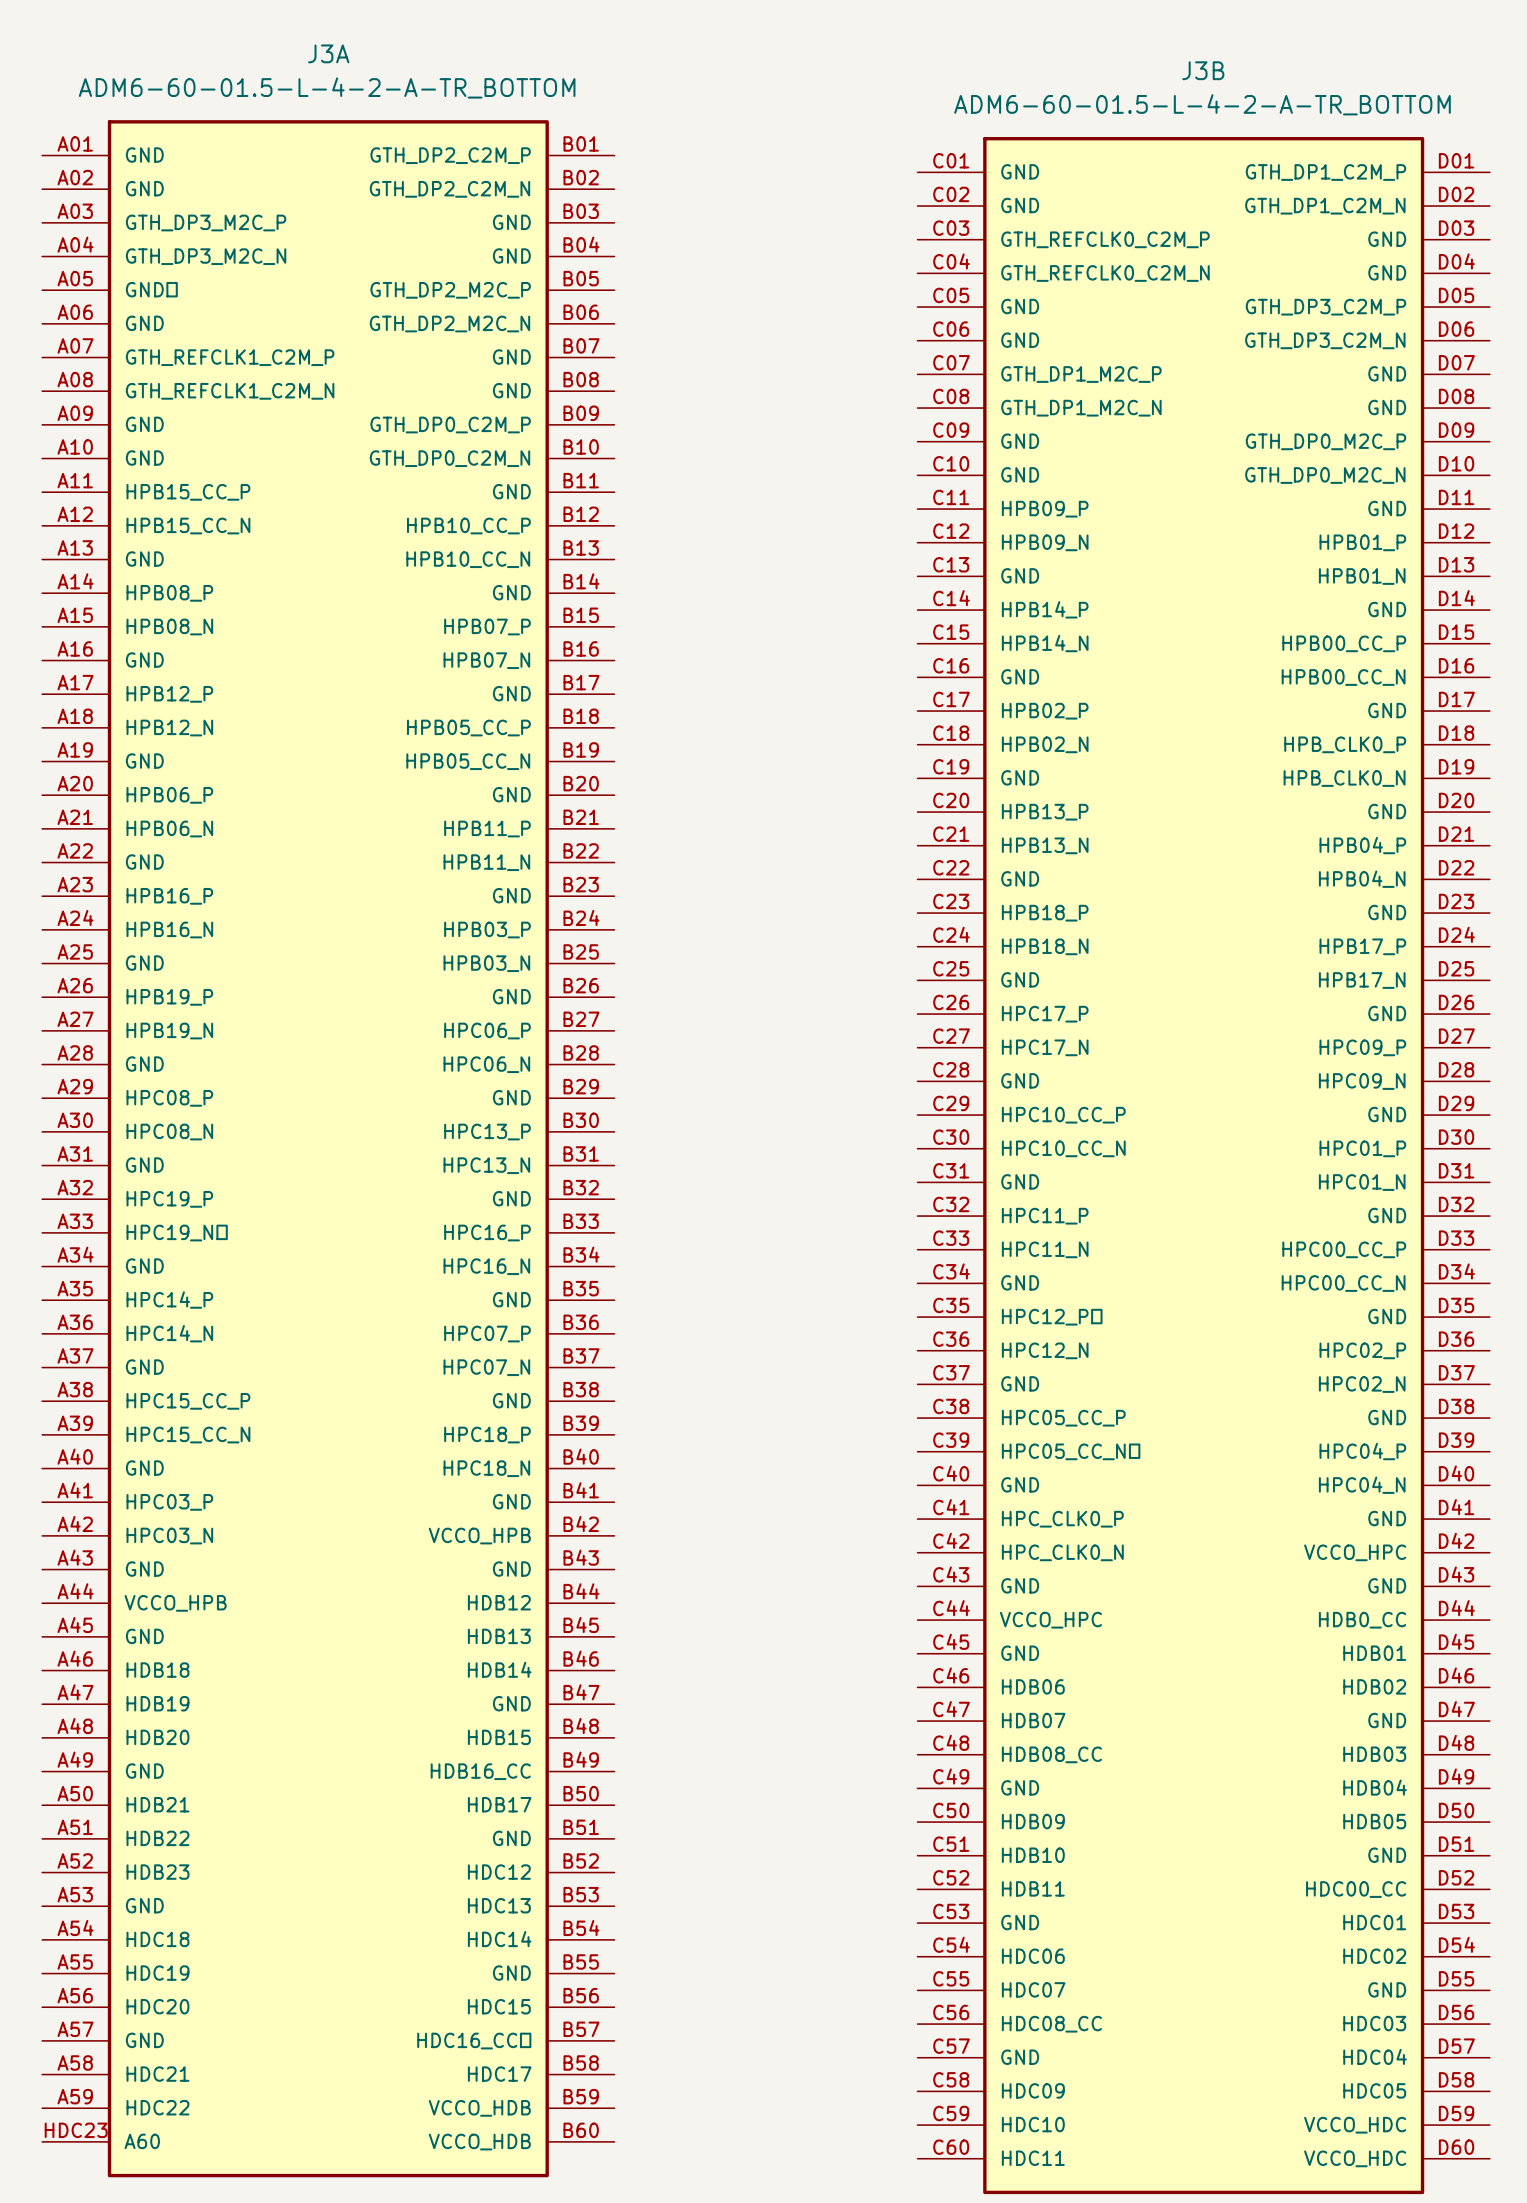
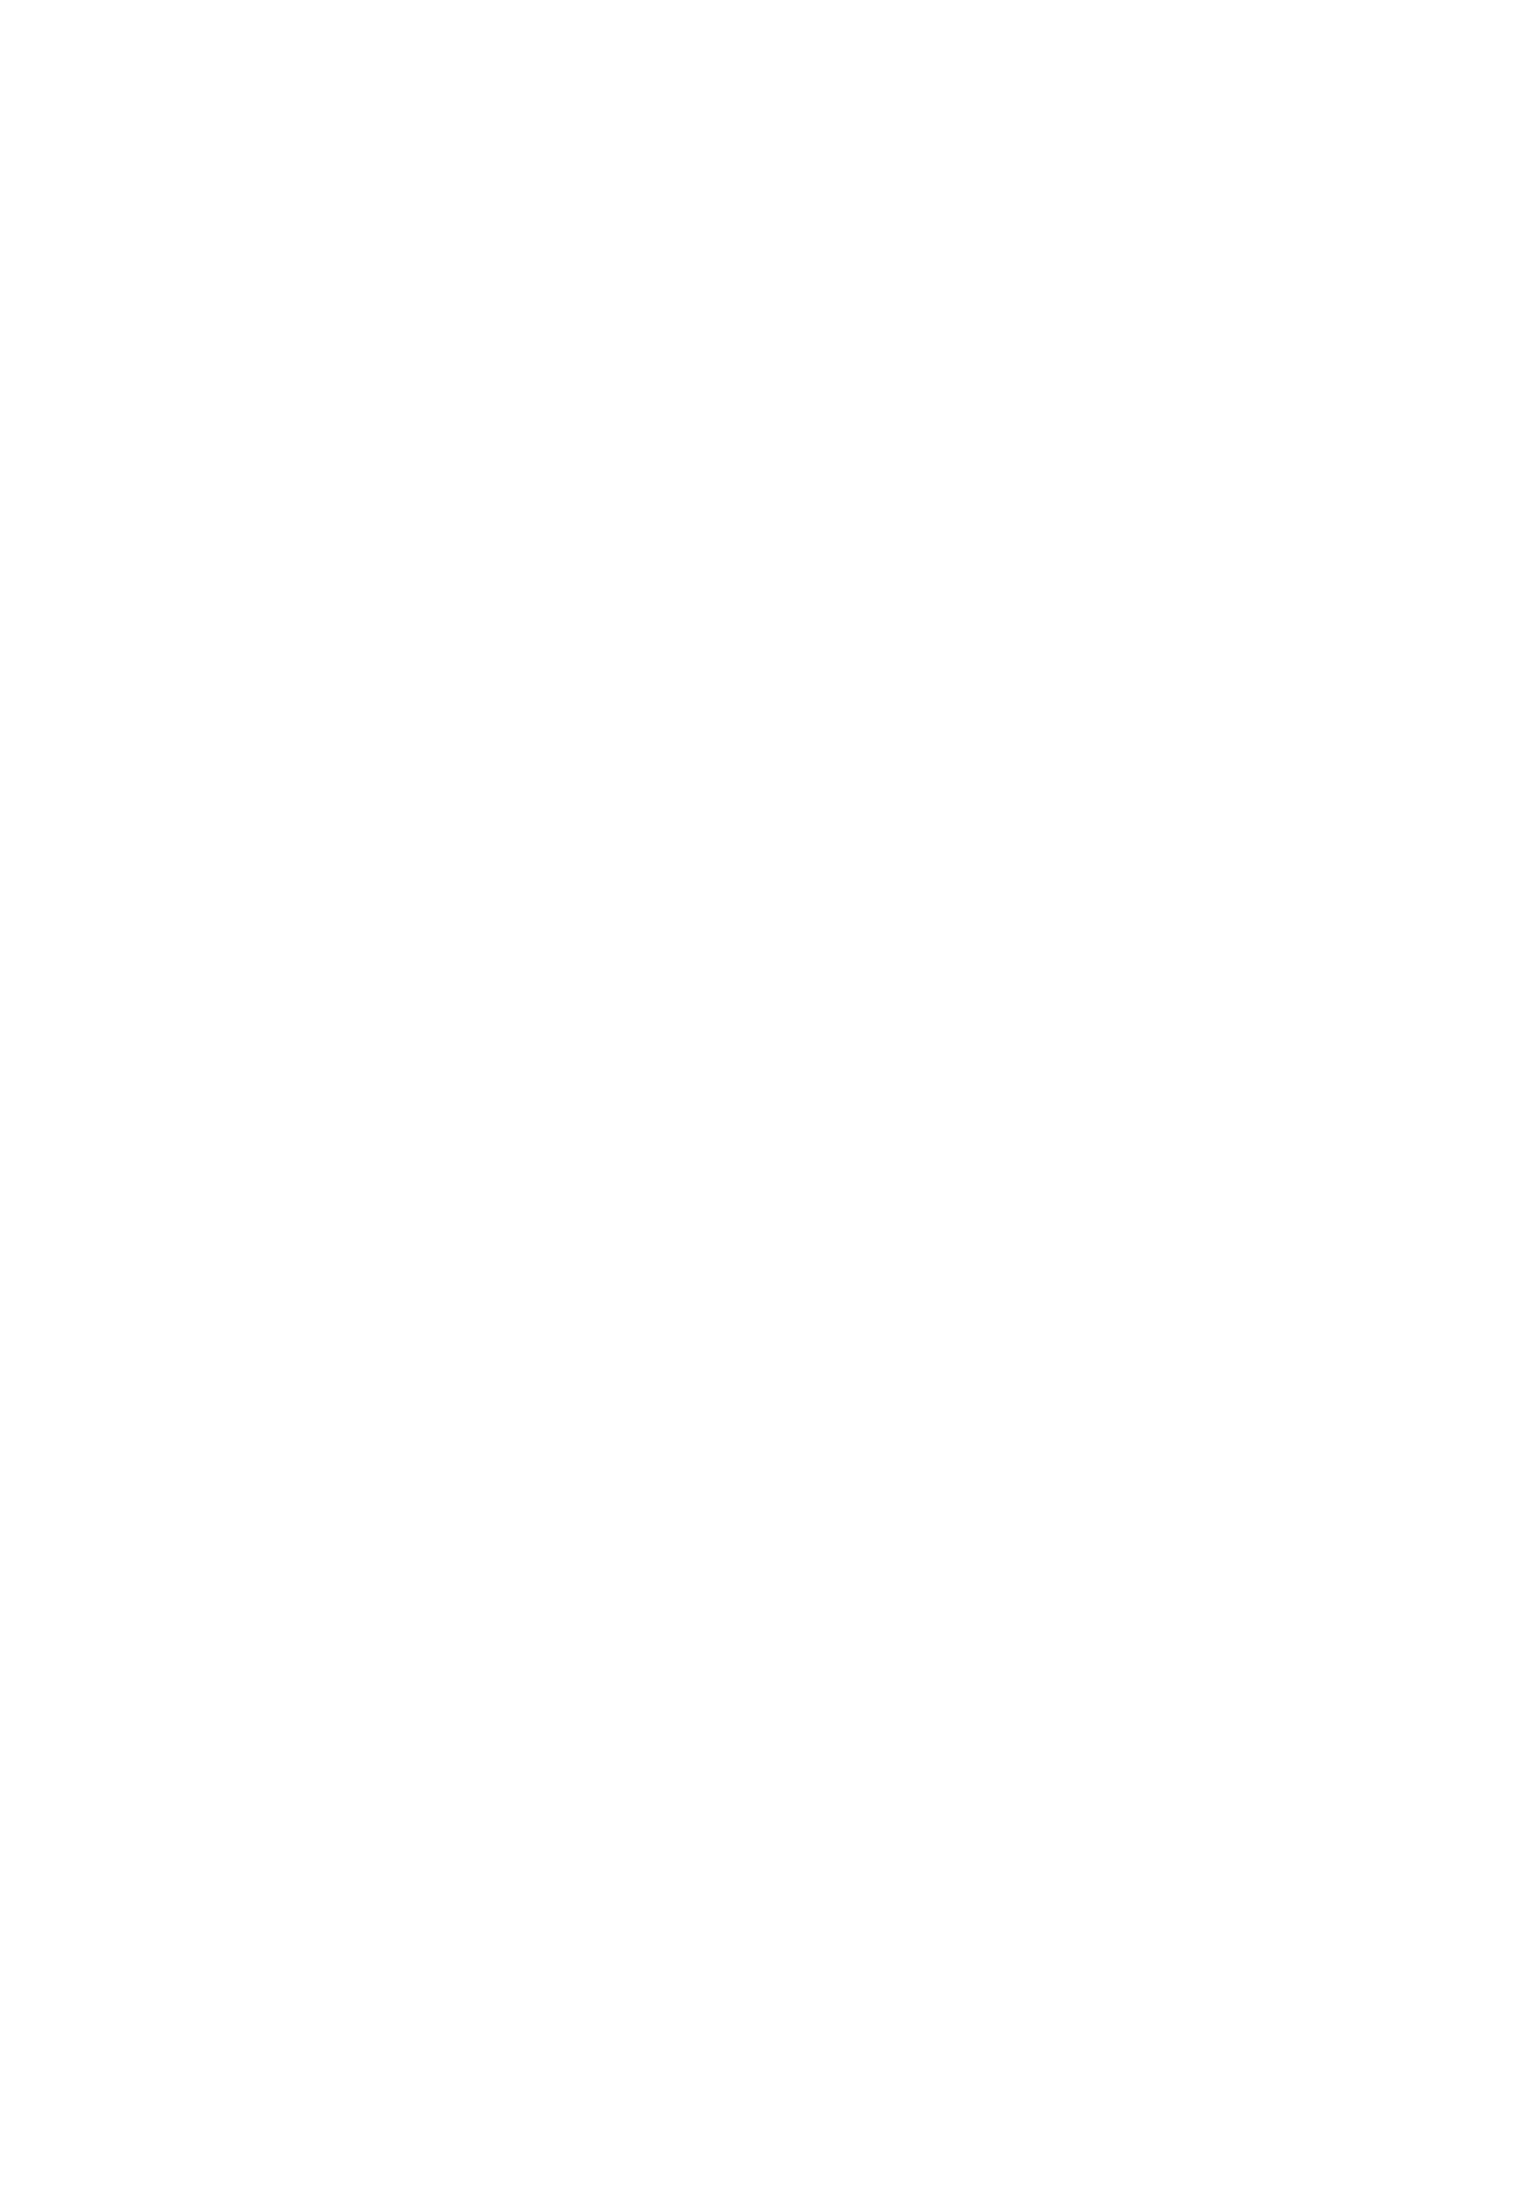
J3A: ADM6-60-01.5-L-4-2-A-TR_BOTTOM (328, 1148) -> none
J3B: ADM6-60-01.5-L-4-2-A-TR_BOTTOM (1203, 1165) -> none

